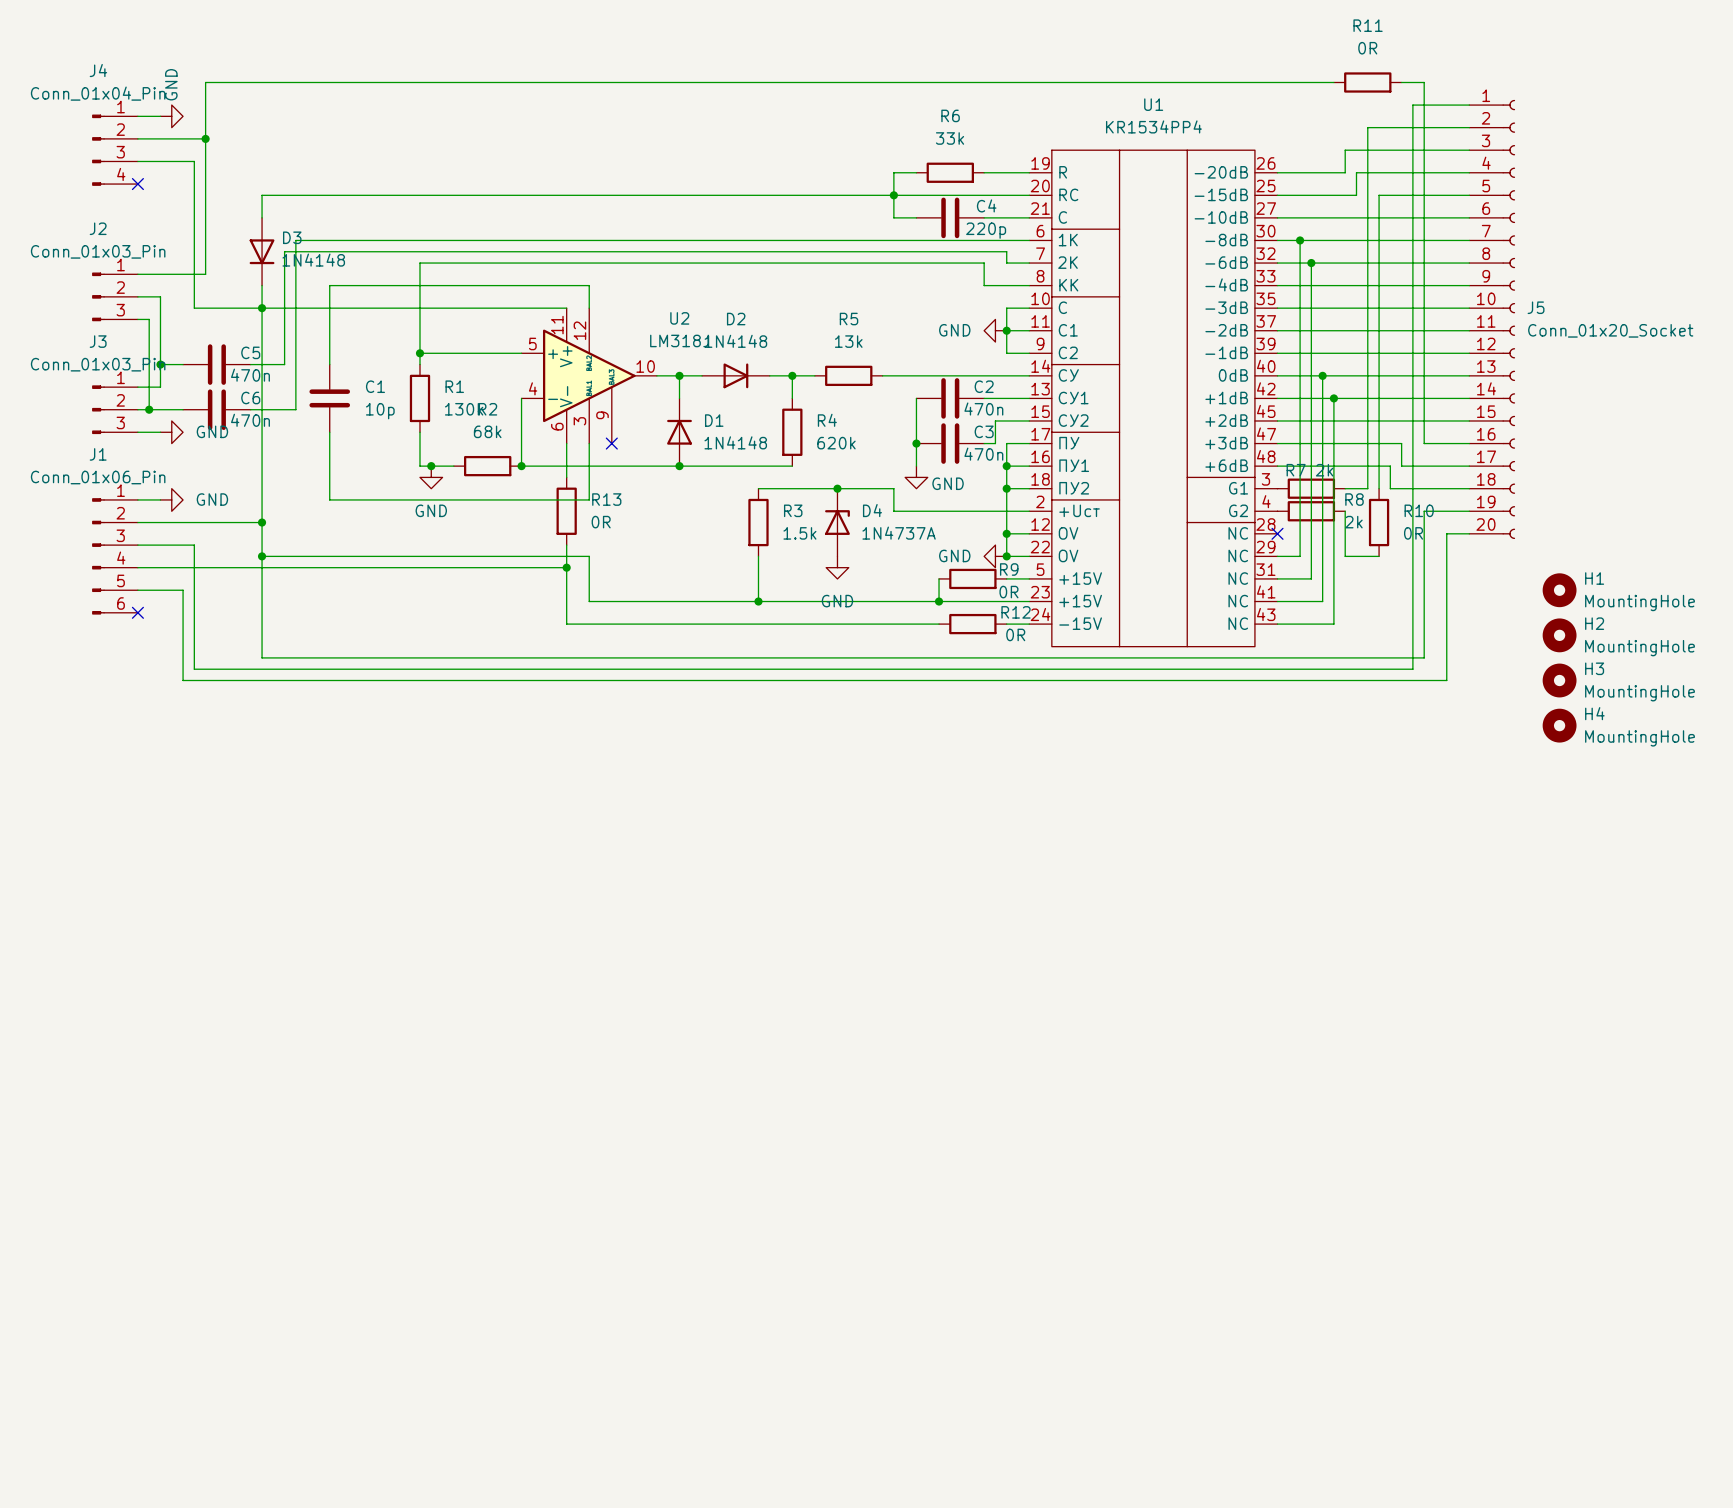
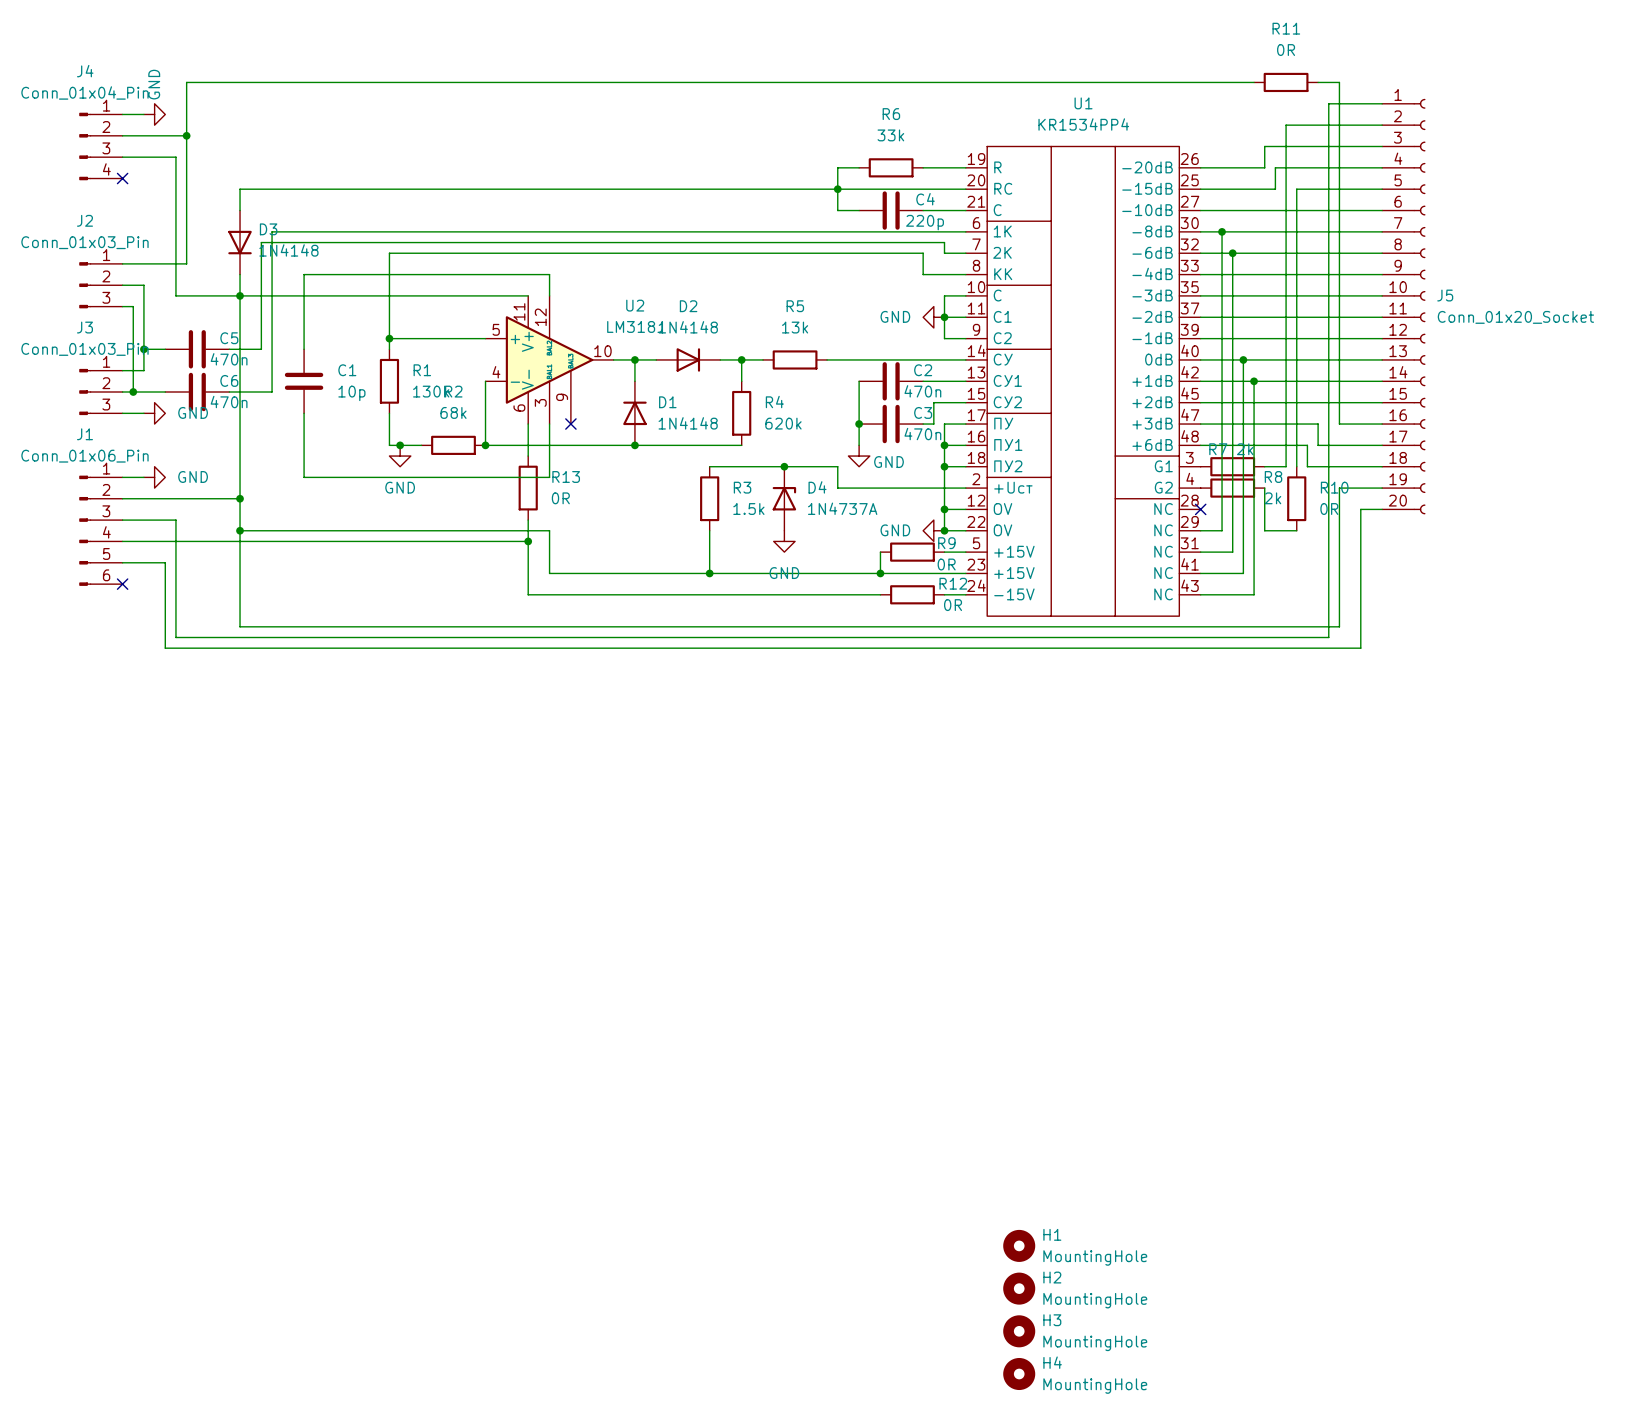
H1 position: (1559, 590) -> (1019, 1245)
H2 position: (1559, 635) -> (1019, 1288)
H3 position: (1559, 680) -> (1019, 1331)
H4 position: (1559, 725) -> (1019, 1374)

